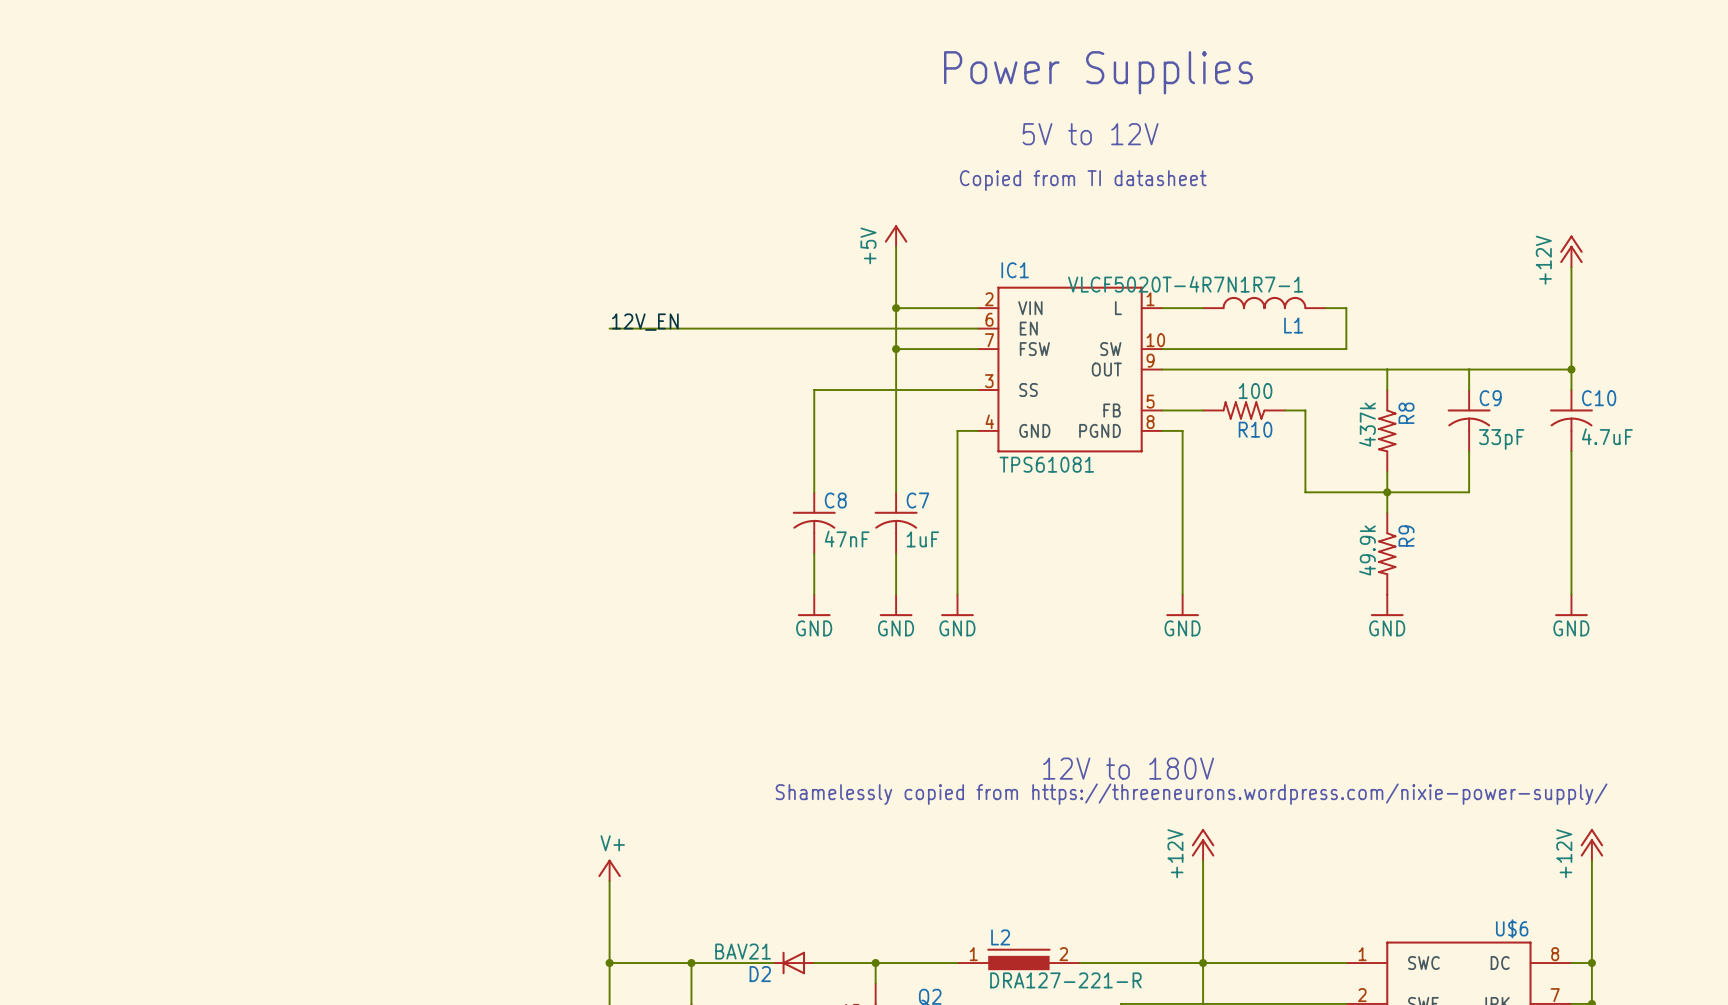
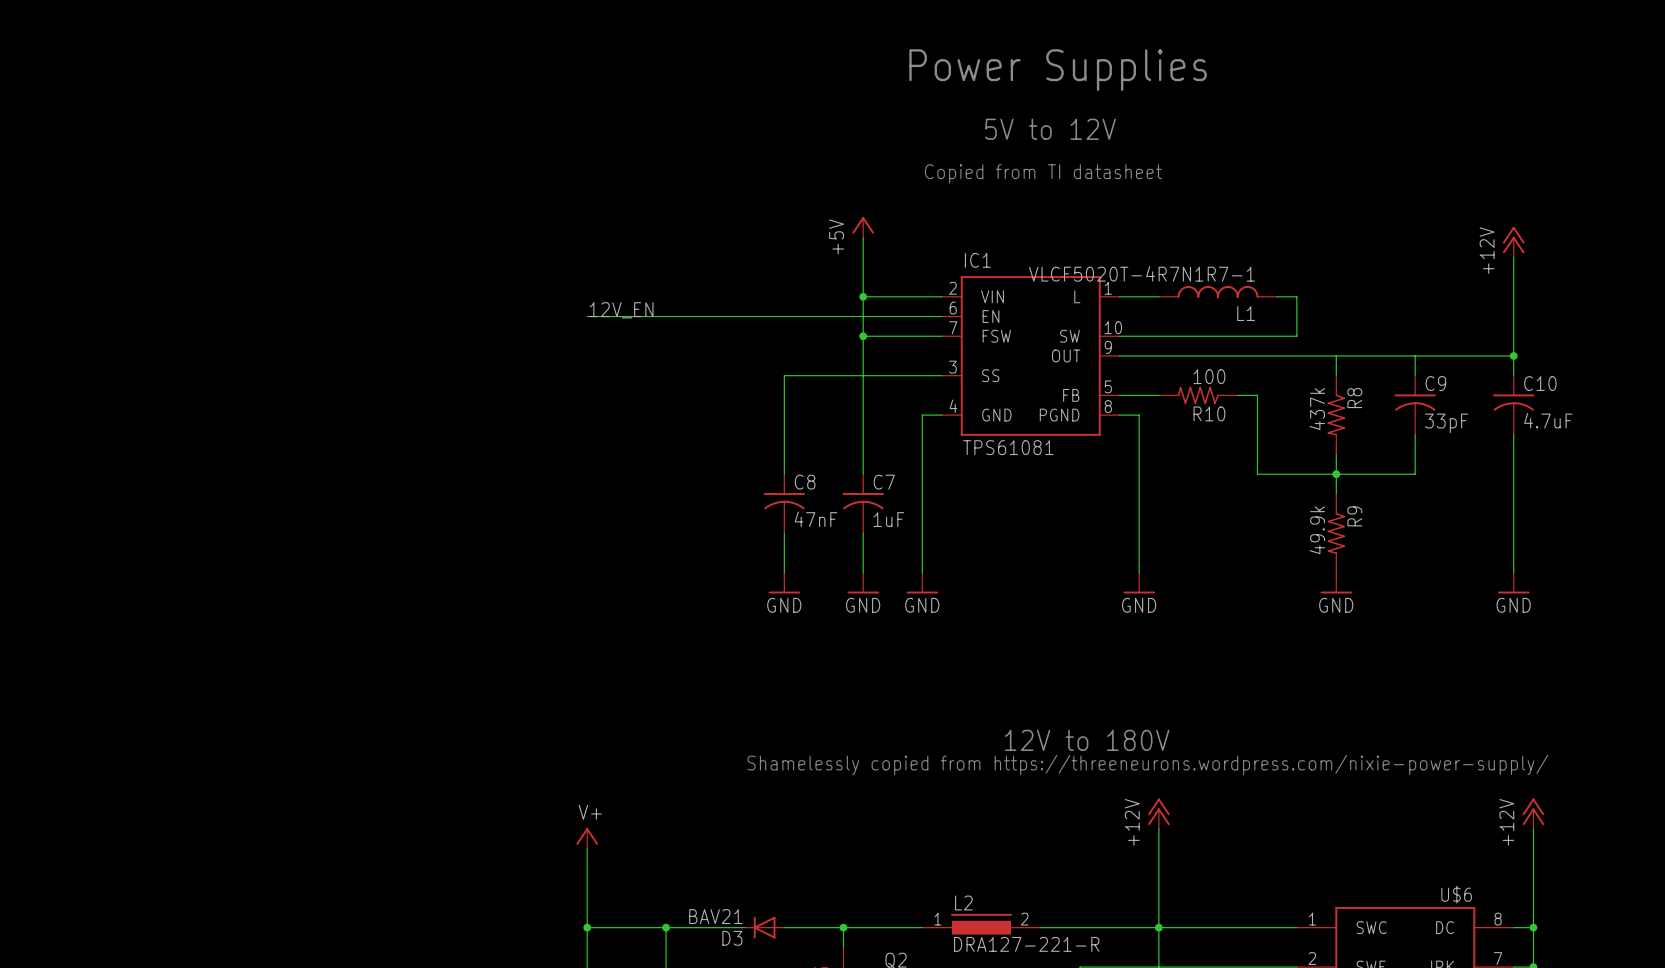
D2 name: D2 (760, 974) -> D3 (732, 938)

